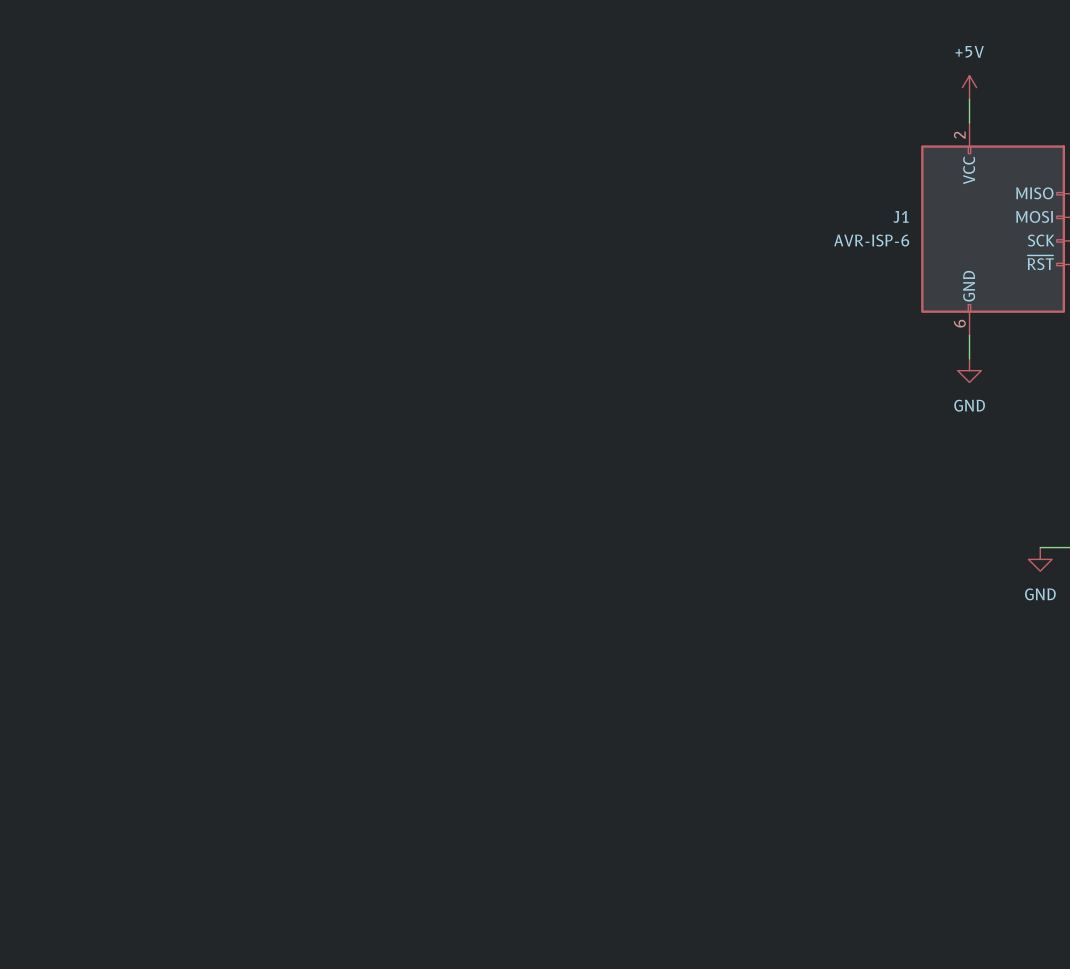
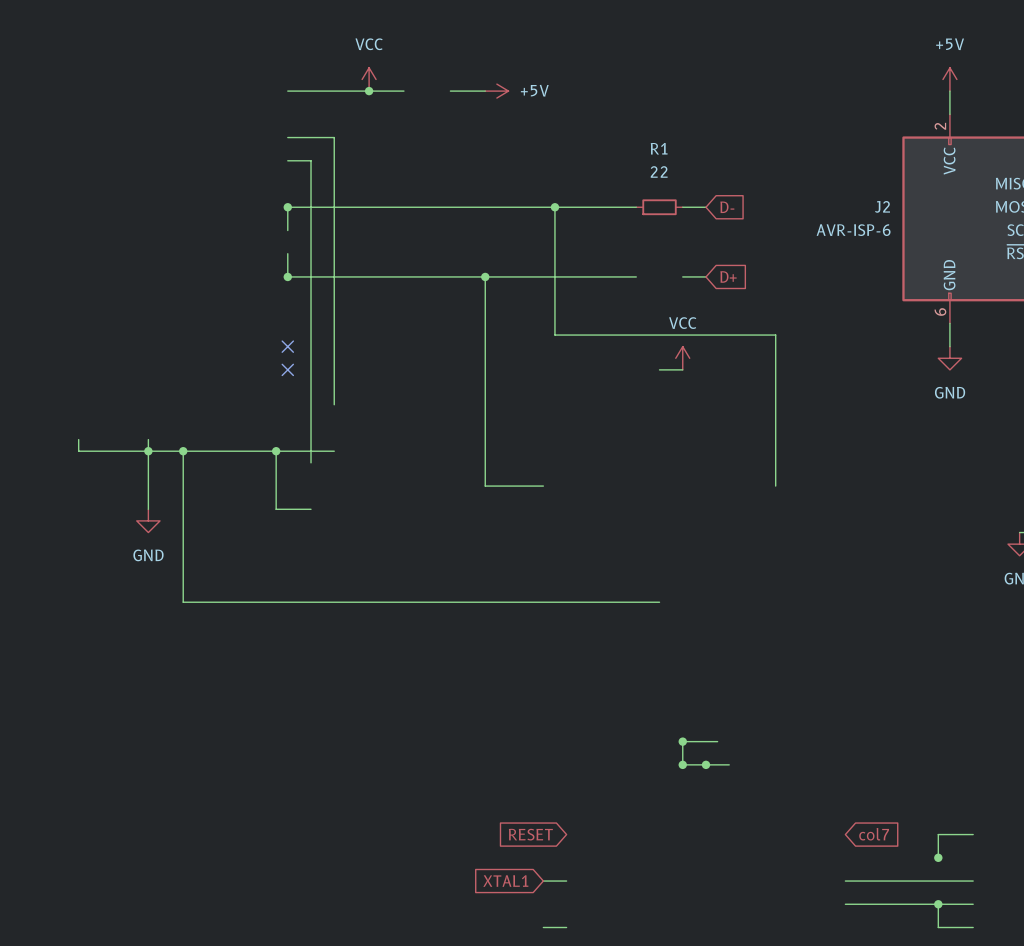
power symbol: none -> VCC (369, 79)
wire: none -> (287, 91) (403, 91)
junction: none -> (369, 91)
wire: none -> (450, 91) (485, 91)
power symbol: none -> +5V (496, 91)
wire: none -> (287, 137) (334, 137) (334, 404)
wire: none -> (287, 160) (311, 160) (311, 462)
J1 name: J1 (901, 216) -> J2 (882, 206)
junction: none -> (287, 207)
wire: none -> (554, 207) (554, 335) (775, 335) (775, 486)
junction: none -> (554, 207)
wire: none -> (636, 207) (287, 207) (287, 230)
R1: none -> 22 (659, 207)
wire: none -> (682, 207) (705, 207)
global label: none -> D- (727, 207)
wire: none -> (287, 253) (287, 276) (636, 276)
junction: none -> (287, 276)
wire: none -> (485, 276) (485, 486) (543, 486)
junction: none -> (485, 276)
wire: none -> (682, 276) (705, 276)
global label: none -> D+ (728, 276)
no-connect mark: none -> (287, 346)
power symbol: none -> VCC (682, 358)
no-connect mark: none -> (287, 369)
wire: none -> (659, 369) (682, 369)
wire: none -> (78, 439) (78, 451) (334, 451)
wire: none -> (148, 439) (148, 509)
junction: none -> (148, 451)
wire: none -> (183, 451) (183, 602) (659, 602)
junction: none -> (183, 451)
wire: none -> (276, 451) (276, 509) (311, 509)
junction: none -> (276, 451)
power symbol: none -> GND (148, 520)
junction: none -> (682, 741)
wire: none -> (717, 741) (682, 741) (682, 764) (729, 764)
junction: none -> (682, 764)
junction: none -> (705, 764)
global label: none -> col7 (874, 834)
global label: none -> RESET (530, 834)
wire: none -> (973, 834) (938, 834) (938, 857)
junction: none -> (938, 857)
global label: none -> XTAL1 (505, 881)
wire: none -> (543, 881) (566, 881)
wire: none -> (845, 881) (973, 881)
wire: none -> (845, 904) (973, 904)
wire: none -> (938, 904) (938, 927) (973, 927)
junction: none -> (938, 904)
wire: none -> (543, 927) (566, 927)

